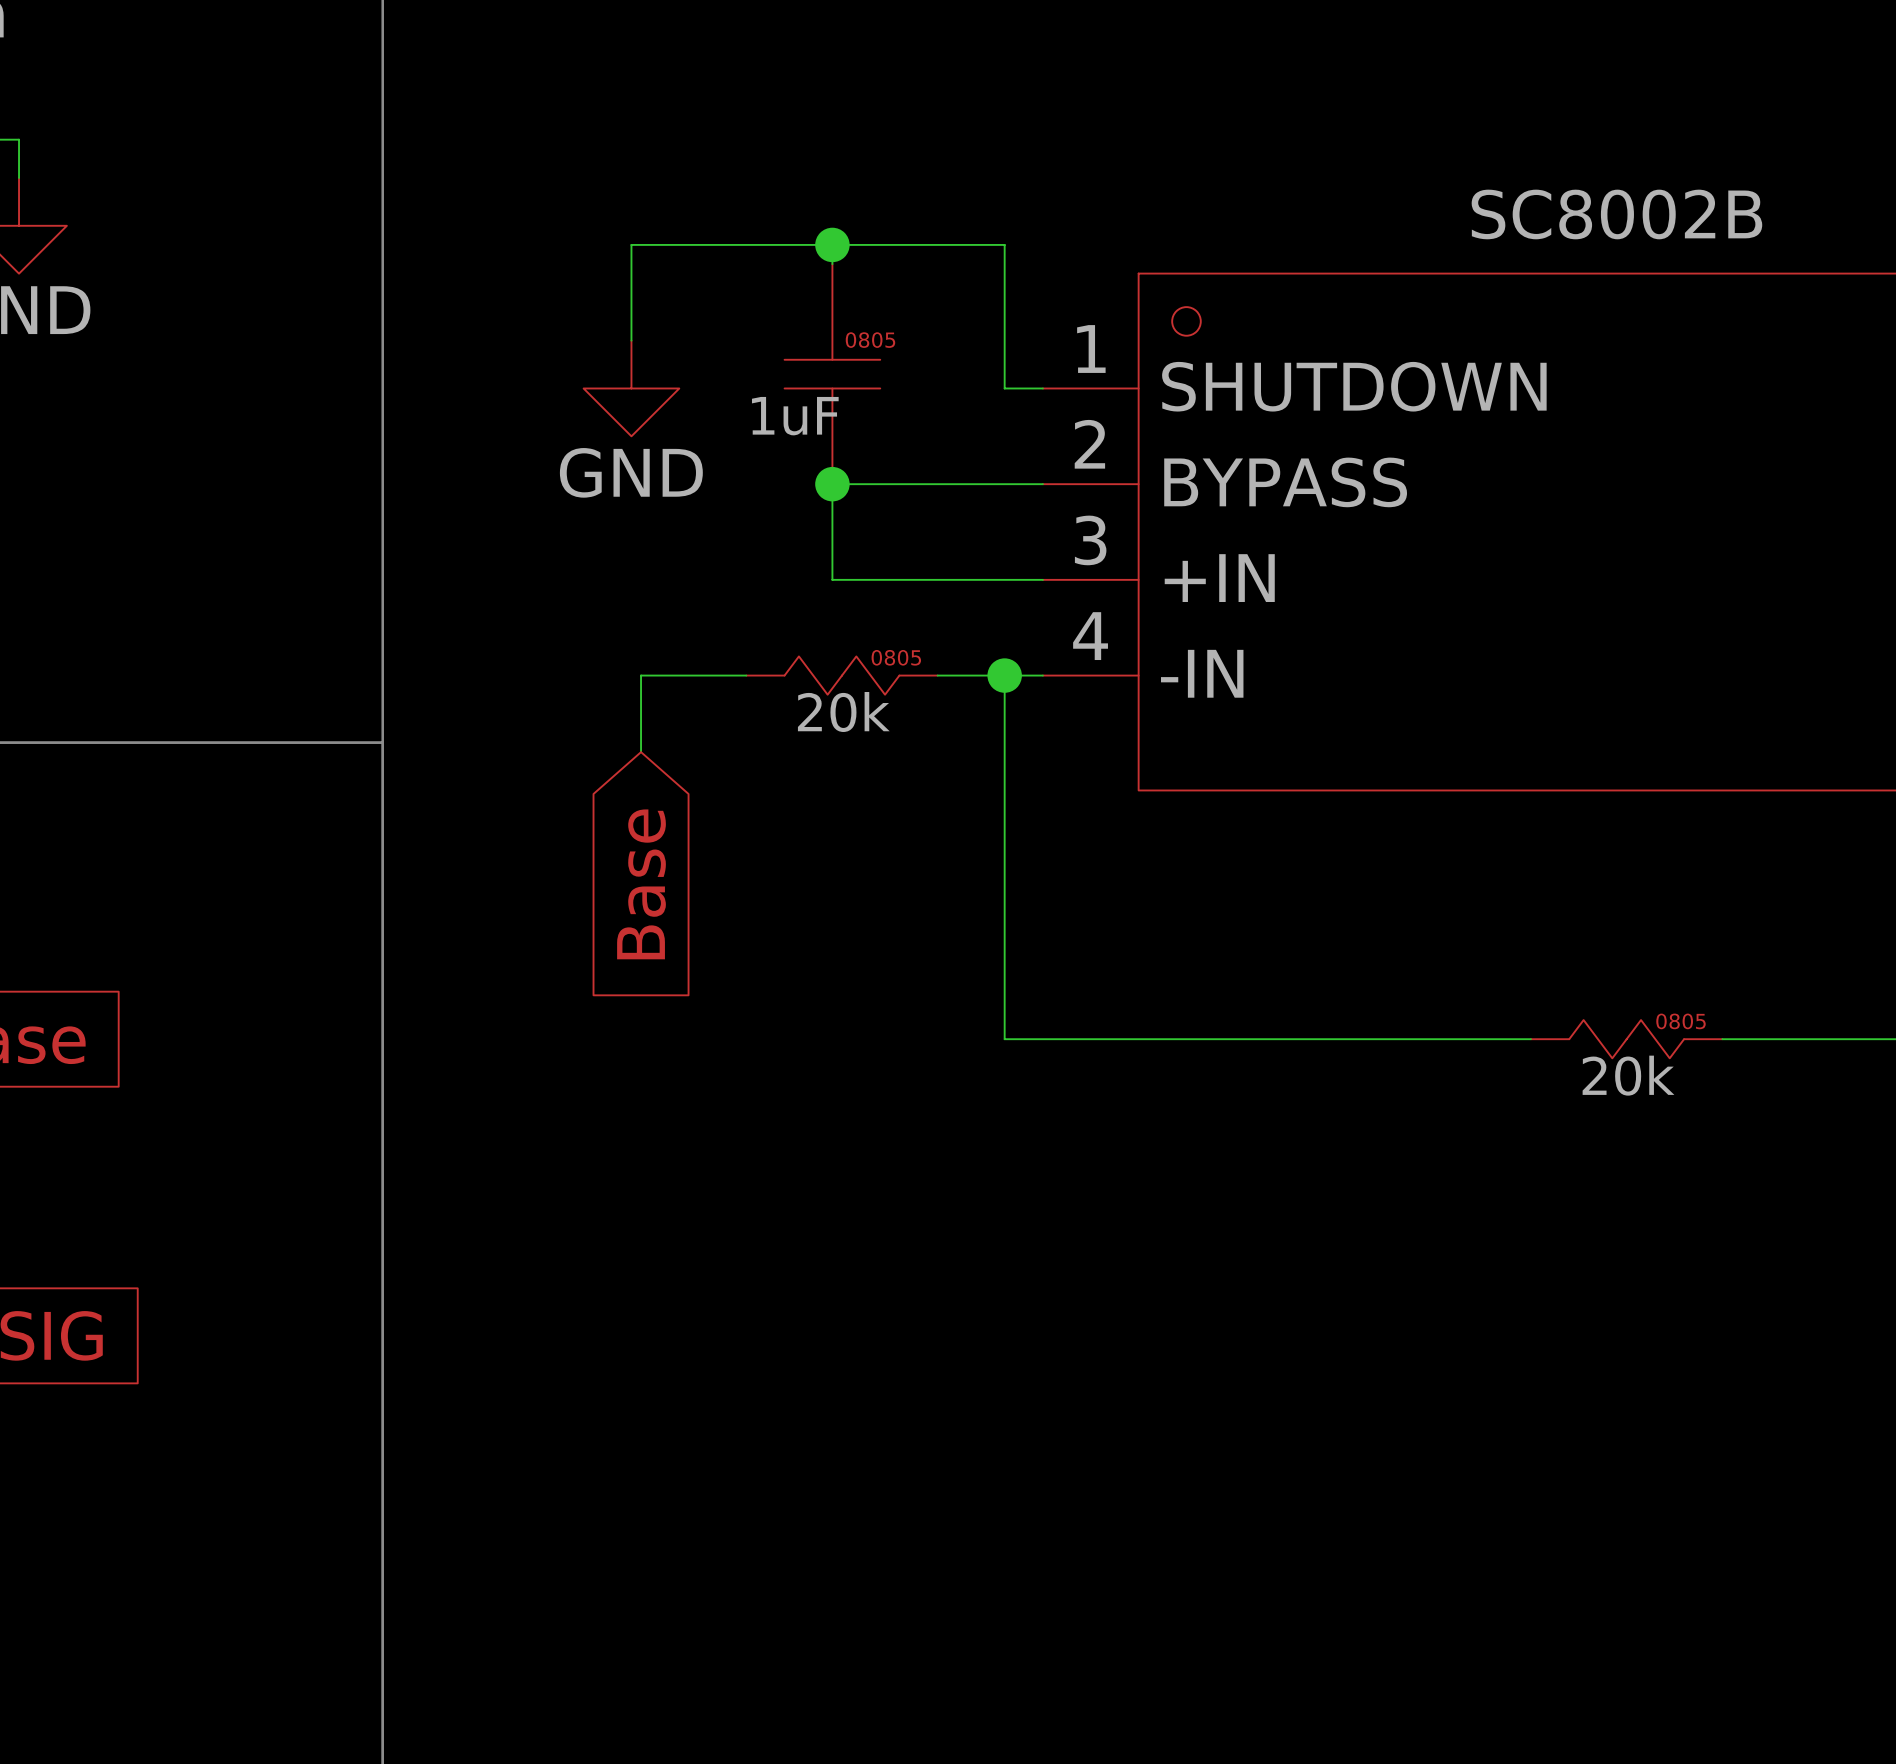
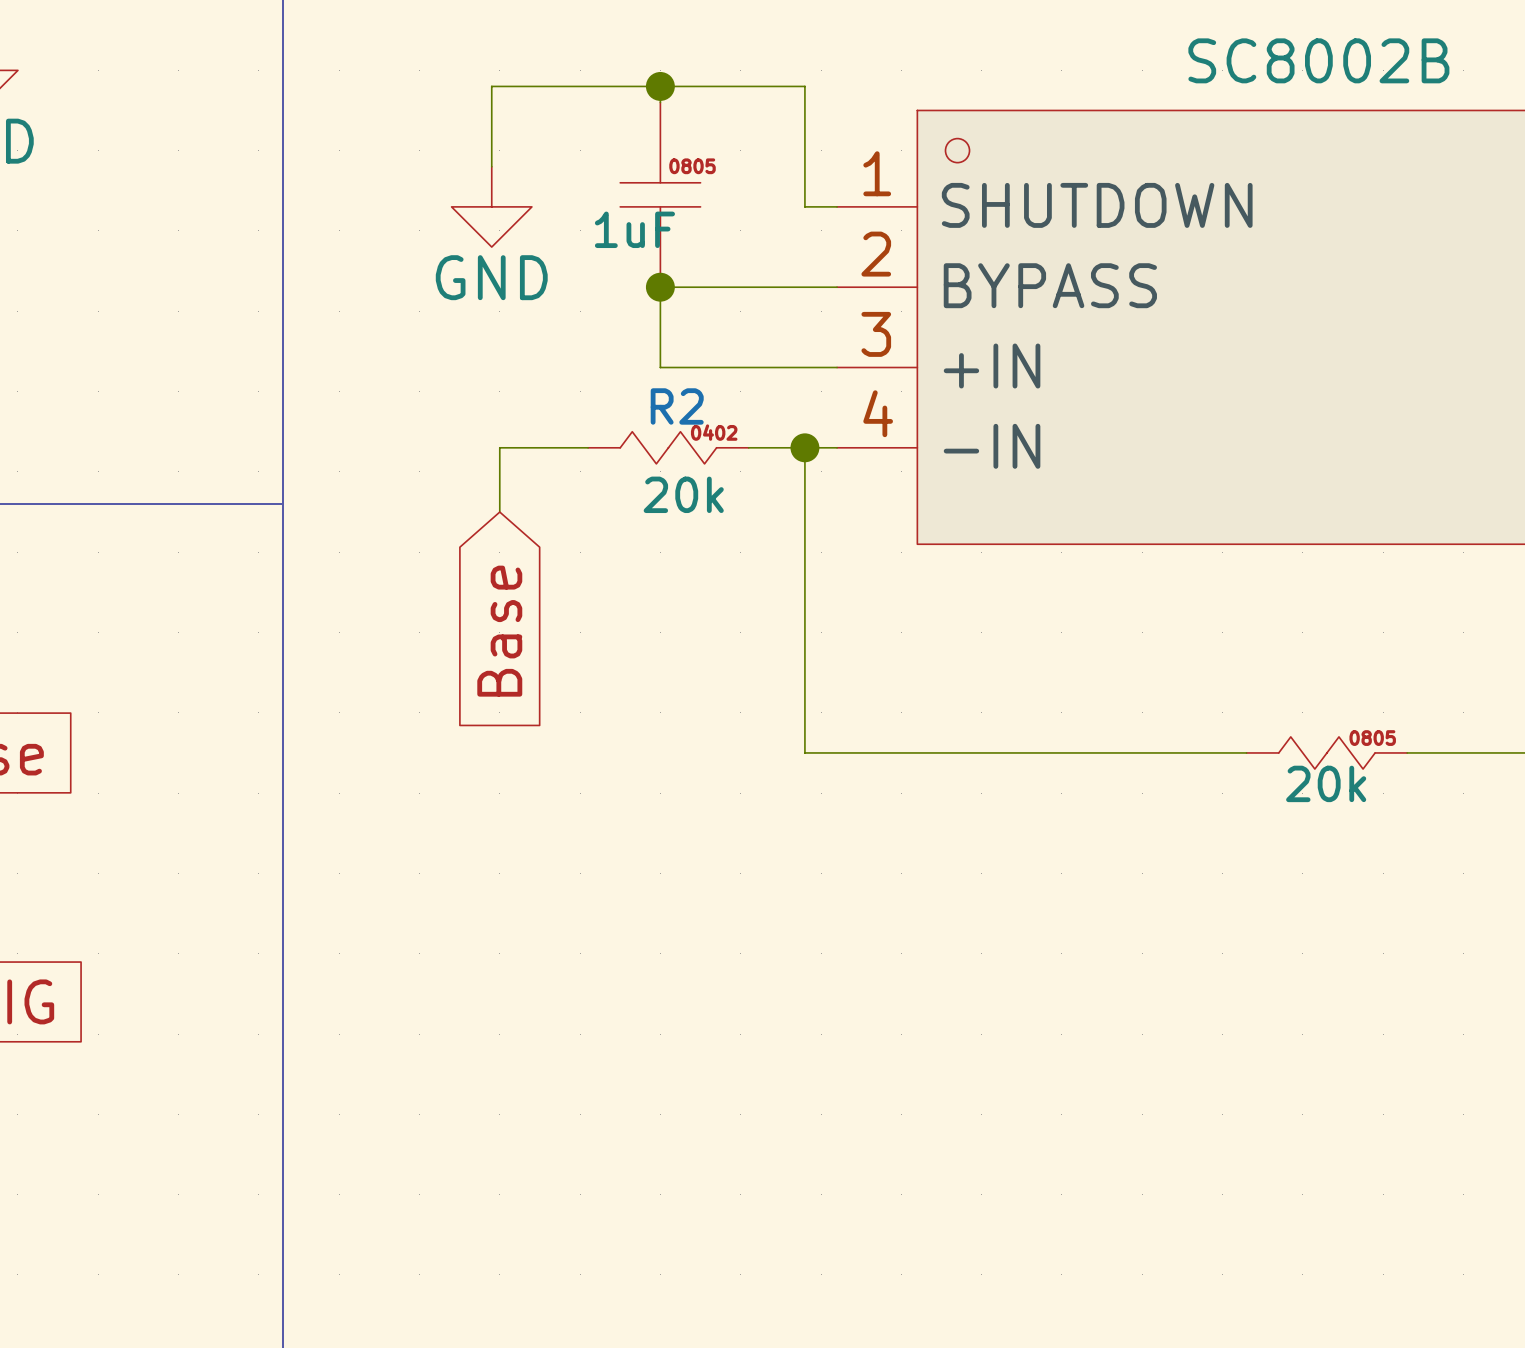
R2 name: none -> R2 (677, 406)
R2 text: 0805 (896, 657) -> 0402 (714, 432)
R2 value position: 20k (843, 712) -> 20k (683, 494)

